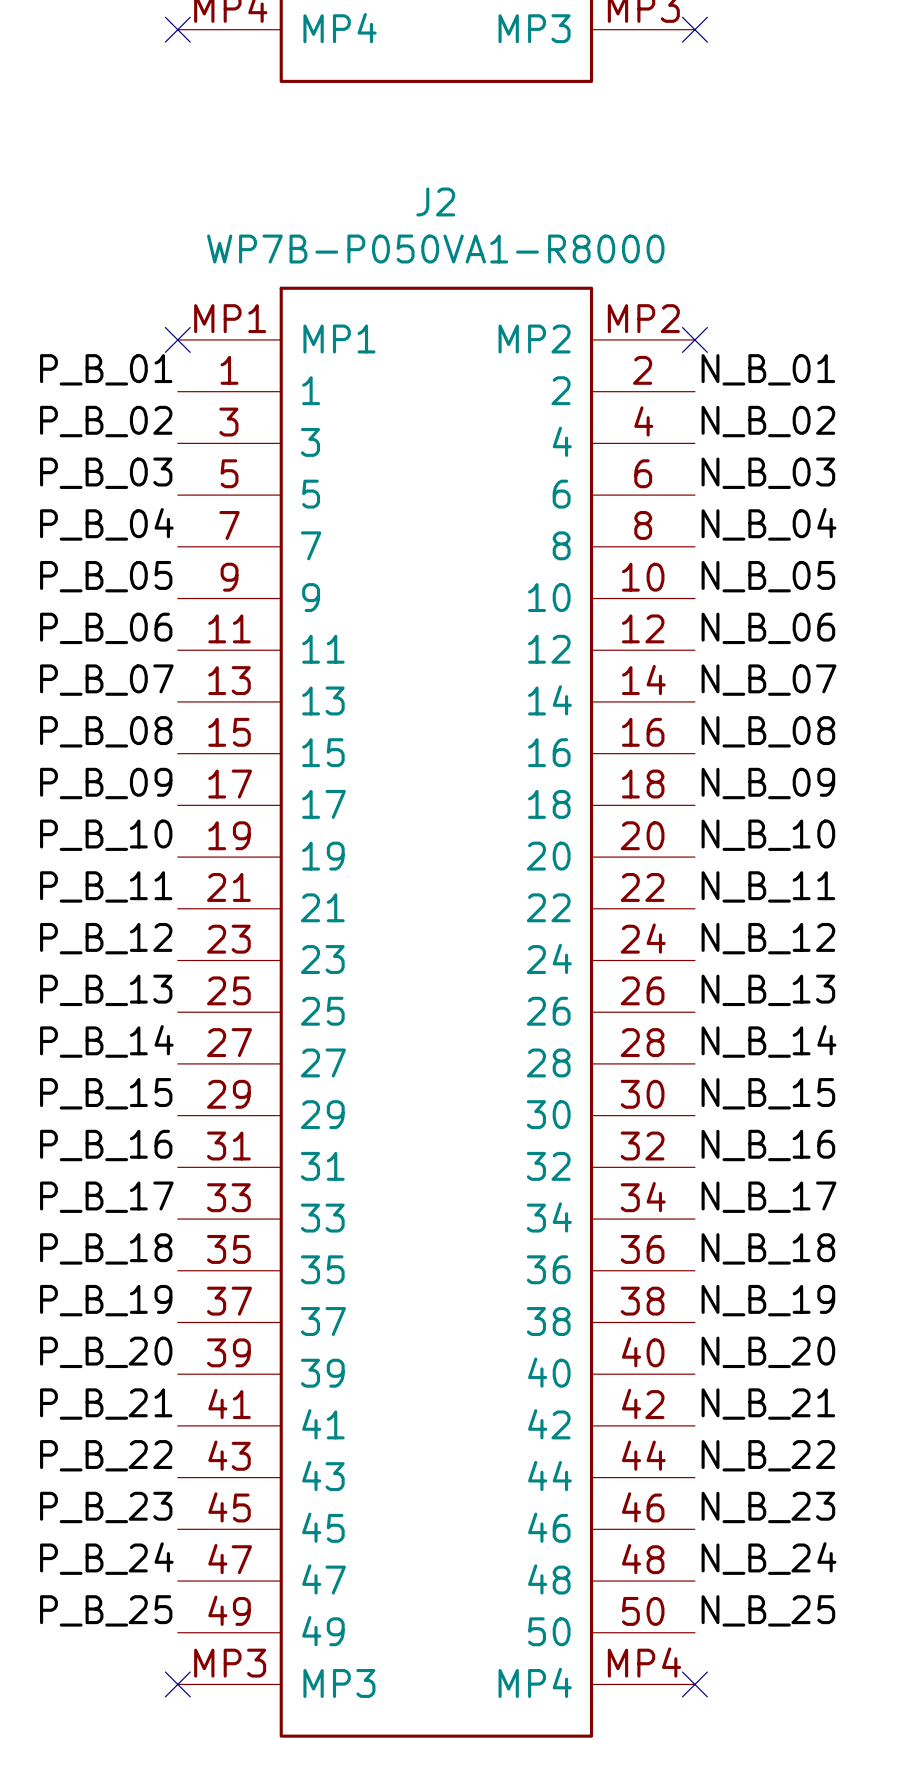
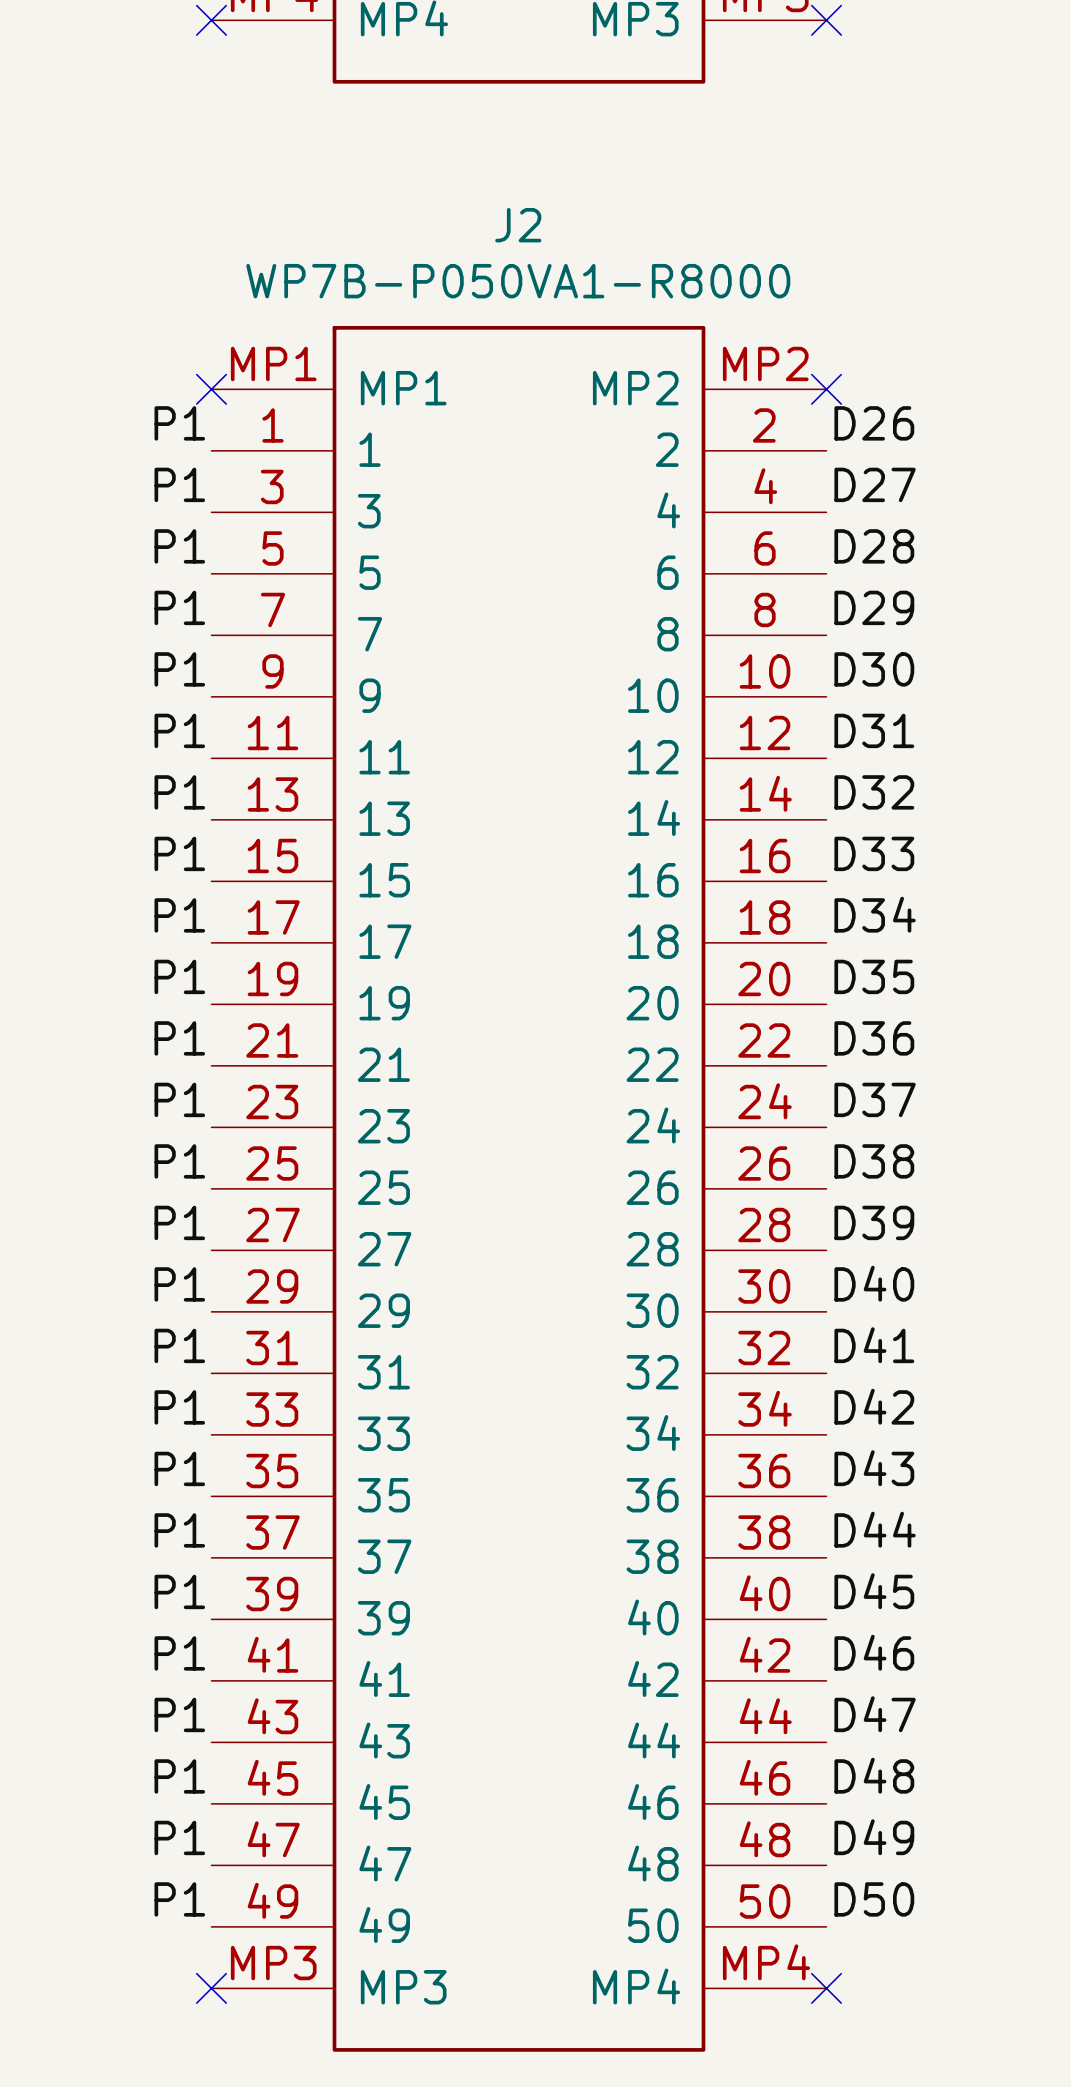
label: P_B_01 (106, 369) -> P1 (179, 423)
label: N_B_01 (768, 369) -> D26 (874, 423)
label: P_B_02 (106, 421) -> P1 (179, 484)
label: N_B_02 (768, 421) -> D27 (875, 484)
label: P_B_03 (106, 473) -> P1 (179, 546)
label: N_B_03 (768, 473) -> D28 (874, 546)
label: P_B_04 (106, 524) -> P1 (179, 607)
label: N_B_04 (768, 524) -> D29 (874, 607)
label: P_B_05 (106, 576) -> P1 (179, 669)
label: N_B_05 (768, 576) -> D30 (874, 669)
label: P_B_06 (106, 628) -> P1 (179, 730)
label: N_B_06 (768, 628) -> D31 (874, 730)
label: P_B_07 (106, 680) -> P1 (179, 792)
label: N_B_07 (768, 680) -> D32 (874, 792)
label: P_B_08 (106, 731) -> P1 (179, 853)
label: N_B_08 (768, 731) -> D33 (874, 853)
label: P_B_09 (106, 783) -> P1 (179, 915)
label: N_B_09 (768, 783) -> D34 (875, 914)
label: P_B_10 (106, 835) -> P1 (179, 976)
label: N_B_10 (768, 835) -> D35 (874, 976)
label: P_B_11 (106, 886) -> P1 (179, 1038)
label: N_B_11 (768, 886) -> D36 (874, 1038)
label: P_B_12 (106, 938) -> P1 (179, 1099)
label: N_B_12 (768, 938) -> D37 (875, 1099)
label: P_B_13 (106, 990) -> P1 (179, 1161)
label: N_B_13 (768, 990) -> D38 (874, 1161)
label: P_B_14 (106, 1041) -> P1 (179, 1222)
label: N_B_14 (768, 1041) -> D39 (874, 1222)
label: P_B_15 (106, 1093) -> P1 (179, 1284)
label: N_B_15 (768, 1093) -> D40 (874, 1283)
label: P_B_16 (106, 1145) -> P1 (179, 1345)
label: N_B_16 (768, 1145) -> D41 (874, 1345)
label: P_B_17 (106, 1197) -> P1 (179, 1407)
label: N_B_17 (768, 1197) -> D42 (874, 1406)
label: P_B_18 (106, 1248) -> P1 (179, 1468)
label: N_B_18 (768, 1248) -> D43 (874, 1468)
label: P_B_19 (106, 1300) -> P1 (179, 1530)
label: N_B_19 (768, 1300) -> D44 (875, 1529)
label: P_B_20 (106, 1352) -> P1 (179, 1591)
label: N_B_20 (768, 1352) -> D45 (874, 1591)
label: P_B_21 (106, 1404) -> P1 (179, 1653)
label: N_B_21 (768, 1404) -> D46 (874, 1652)
label: P_B_22 (106, 1455) -> P1 (179, 1714)
label: N_B_22 (768, 1455) -> D47 (875, 1714)
label: P_B_23 (106, 1507) -> P1 (179, 1776)
label: N_B_23 (768, 1507) -> D48 (874, 1775)
label: P_B_24 (106, 1558) -> P1 (179, 1837)
label: N_B_24 (768, 1558) -> D49 (874, 1837)
label: P_B_25 (106, 1610) -> P1 (179, 1899)
label: N_B_25 (768, 1610) -> D50 (874, 1899)

